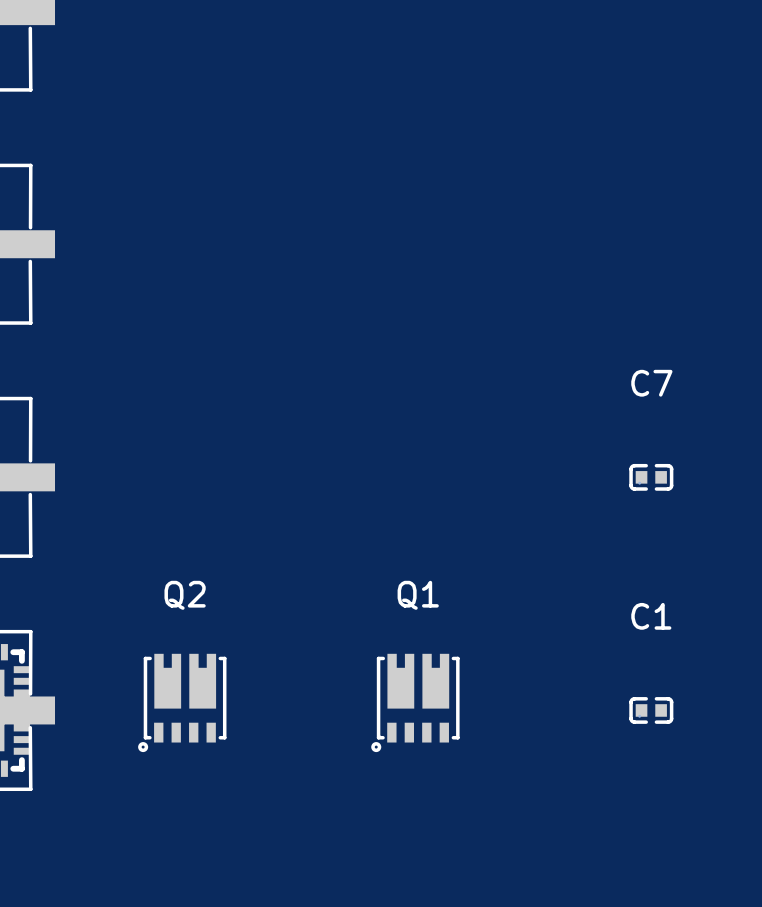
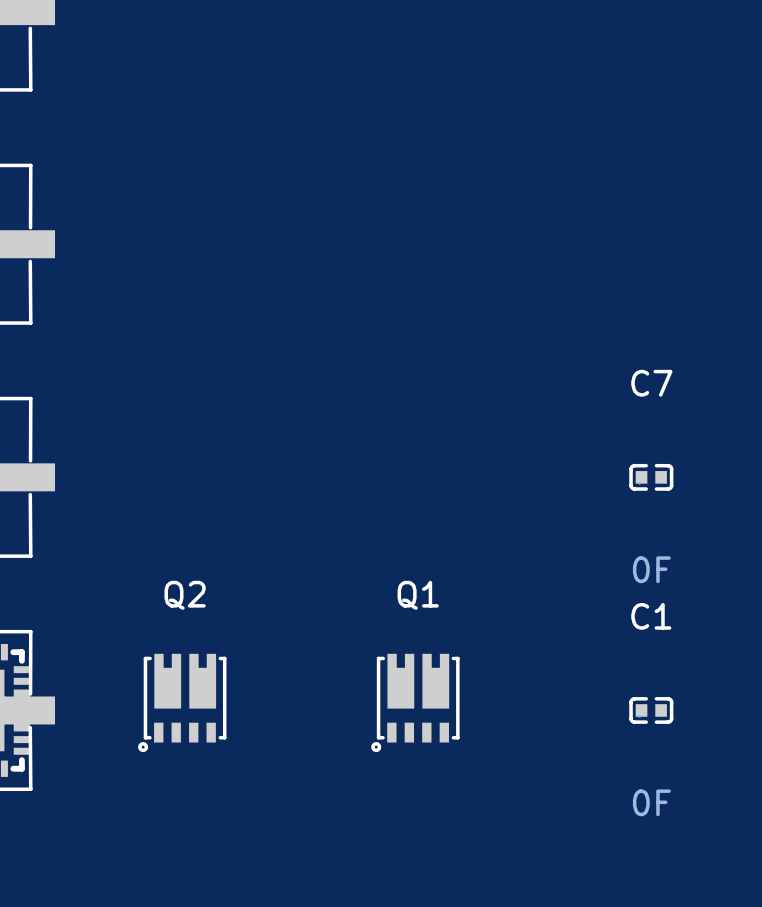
C7 value: none -> 0F (651, 569)
C1 value: none -> 0F (651, 802)

